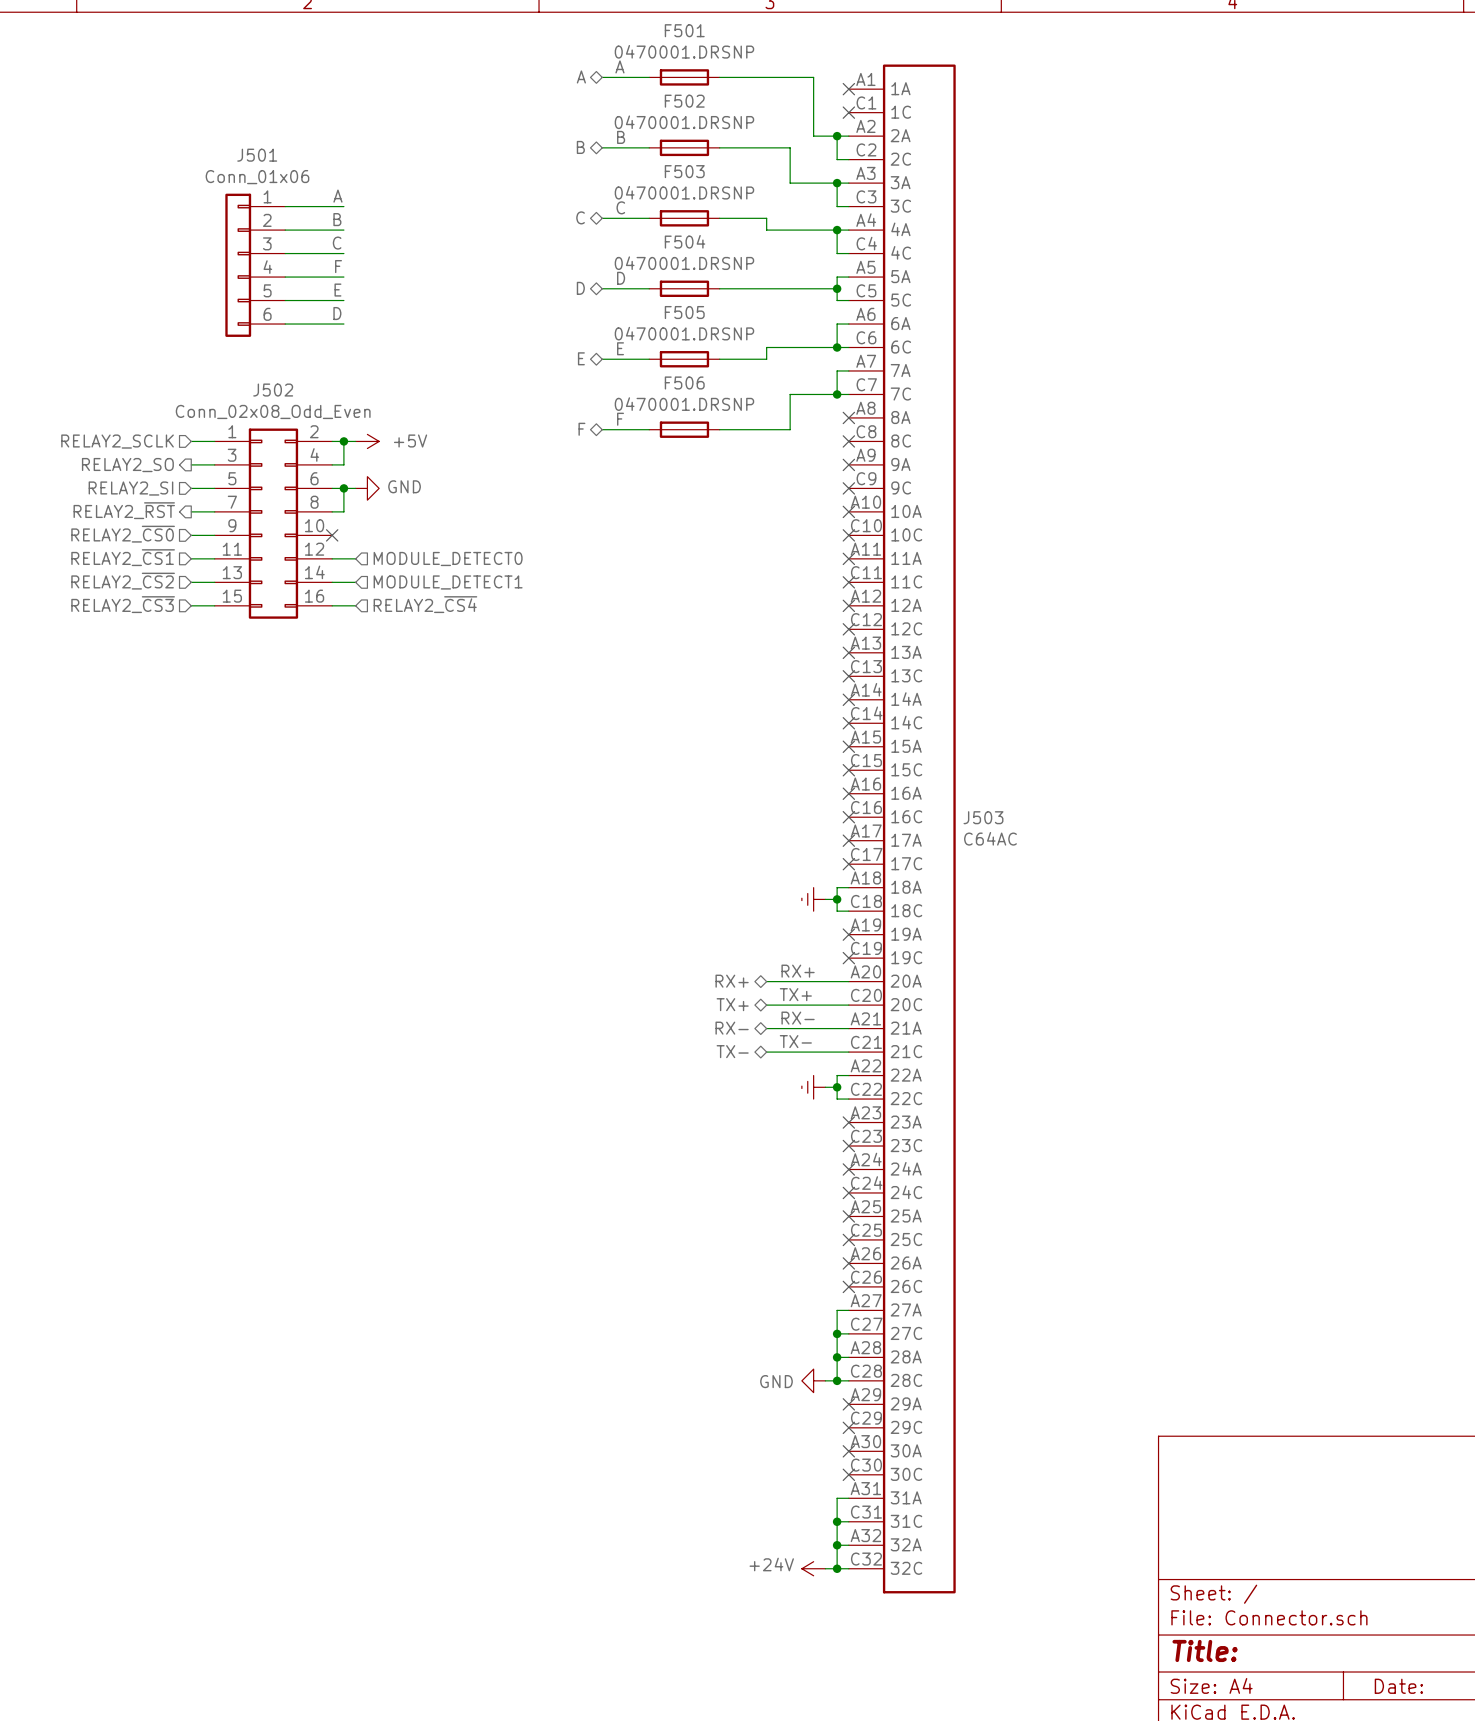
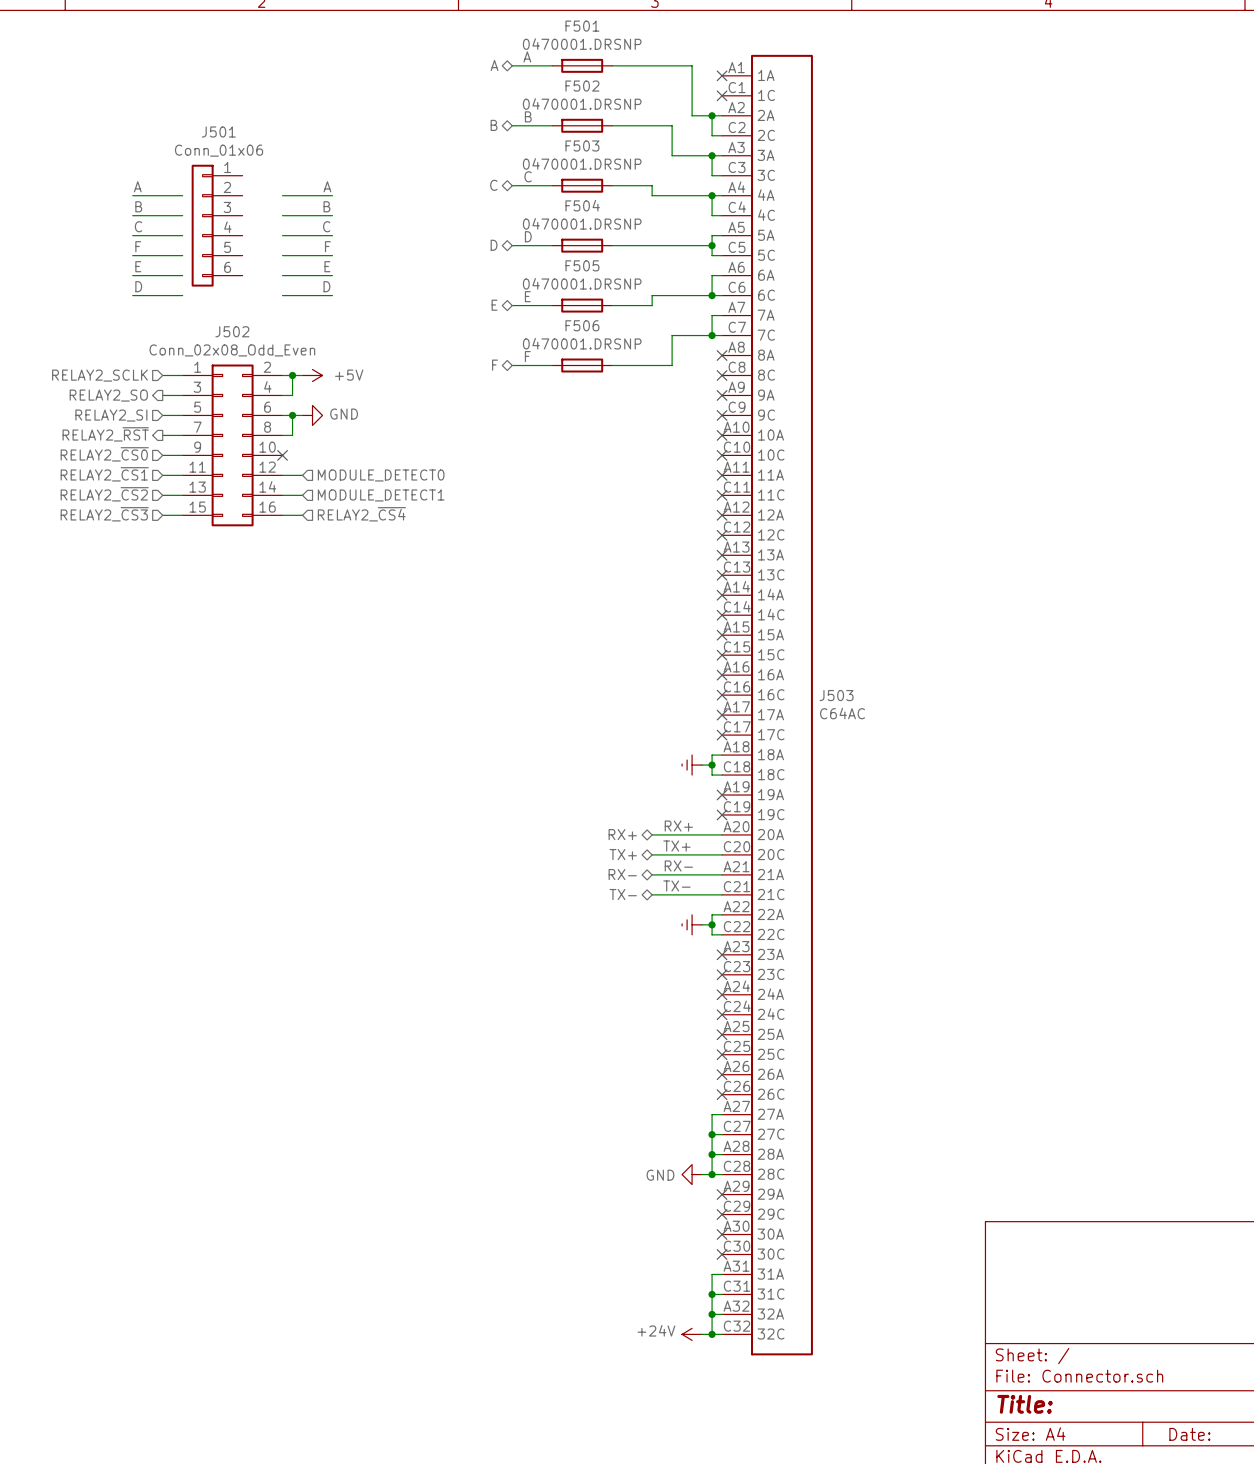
label position: A (337, 196) -> A (327, 186)
wire: (285, 206) (343, 206) -> (132, 195) (182, 195)
label: none -> A (137, 186)
label position: B (337, 219) -> B (326, 206)
wire: (285, 230) (332, 230) -> (292, 195) (332, 195)
label: none -> B (138, 206)
label position: C (337, 243) -> C (326, 226)
wire: none -> (132, 215) (182, 215)
wire: (285, 253) (332, 253) -> (292, 215) (332, 215)
label: none -> C (138, 226)
label position: F (338, 266) -> F (327, 246)
wire: none -> (132, 235) (182, 235)
wire: (285, 277) (332, 277) -> (292, 235) (332, 235)
label: none -> F (138, 246)
label position: E (337, 290) -> E (327, 266)
wire: none -> (132, 255) (182, 255)
wire: (285, 300) (332, 300) -> (292, 255) (332, 255)
label: none -> E (138, 266)
label position: D (337, 313) -> D (326, 286)
wire: none -> (132, 275) (182, 275)
wire: (285, 324) (332, 324) -> (292, 275) (332, 275)
label: none -> D (138, 286)
wire: none -> (132, 295) (182, 295)
wire: none -> (282, 295) (332, 295)

